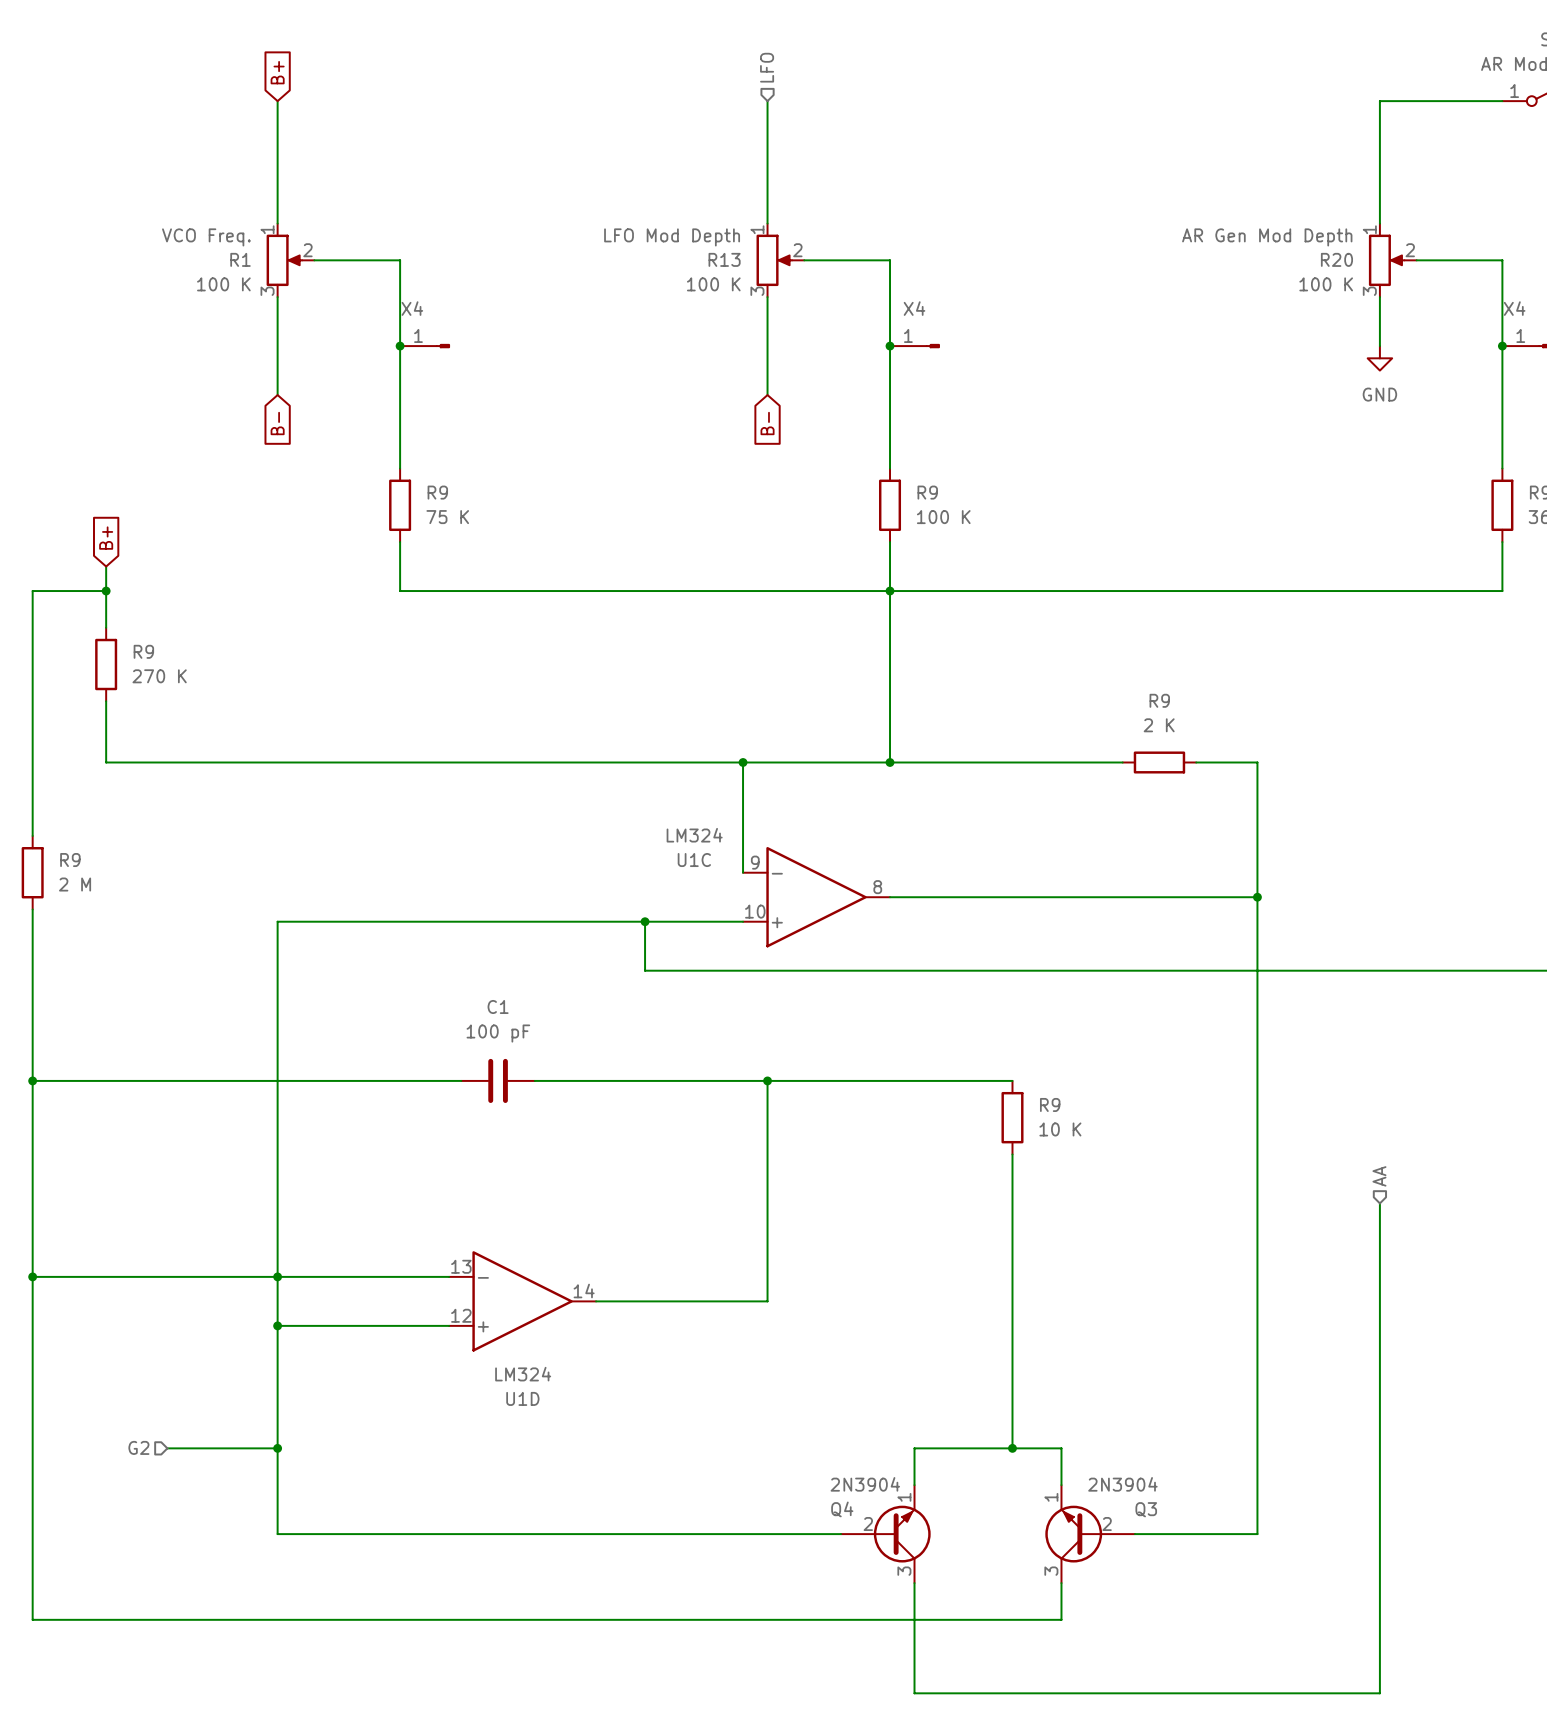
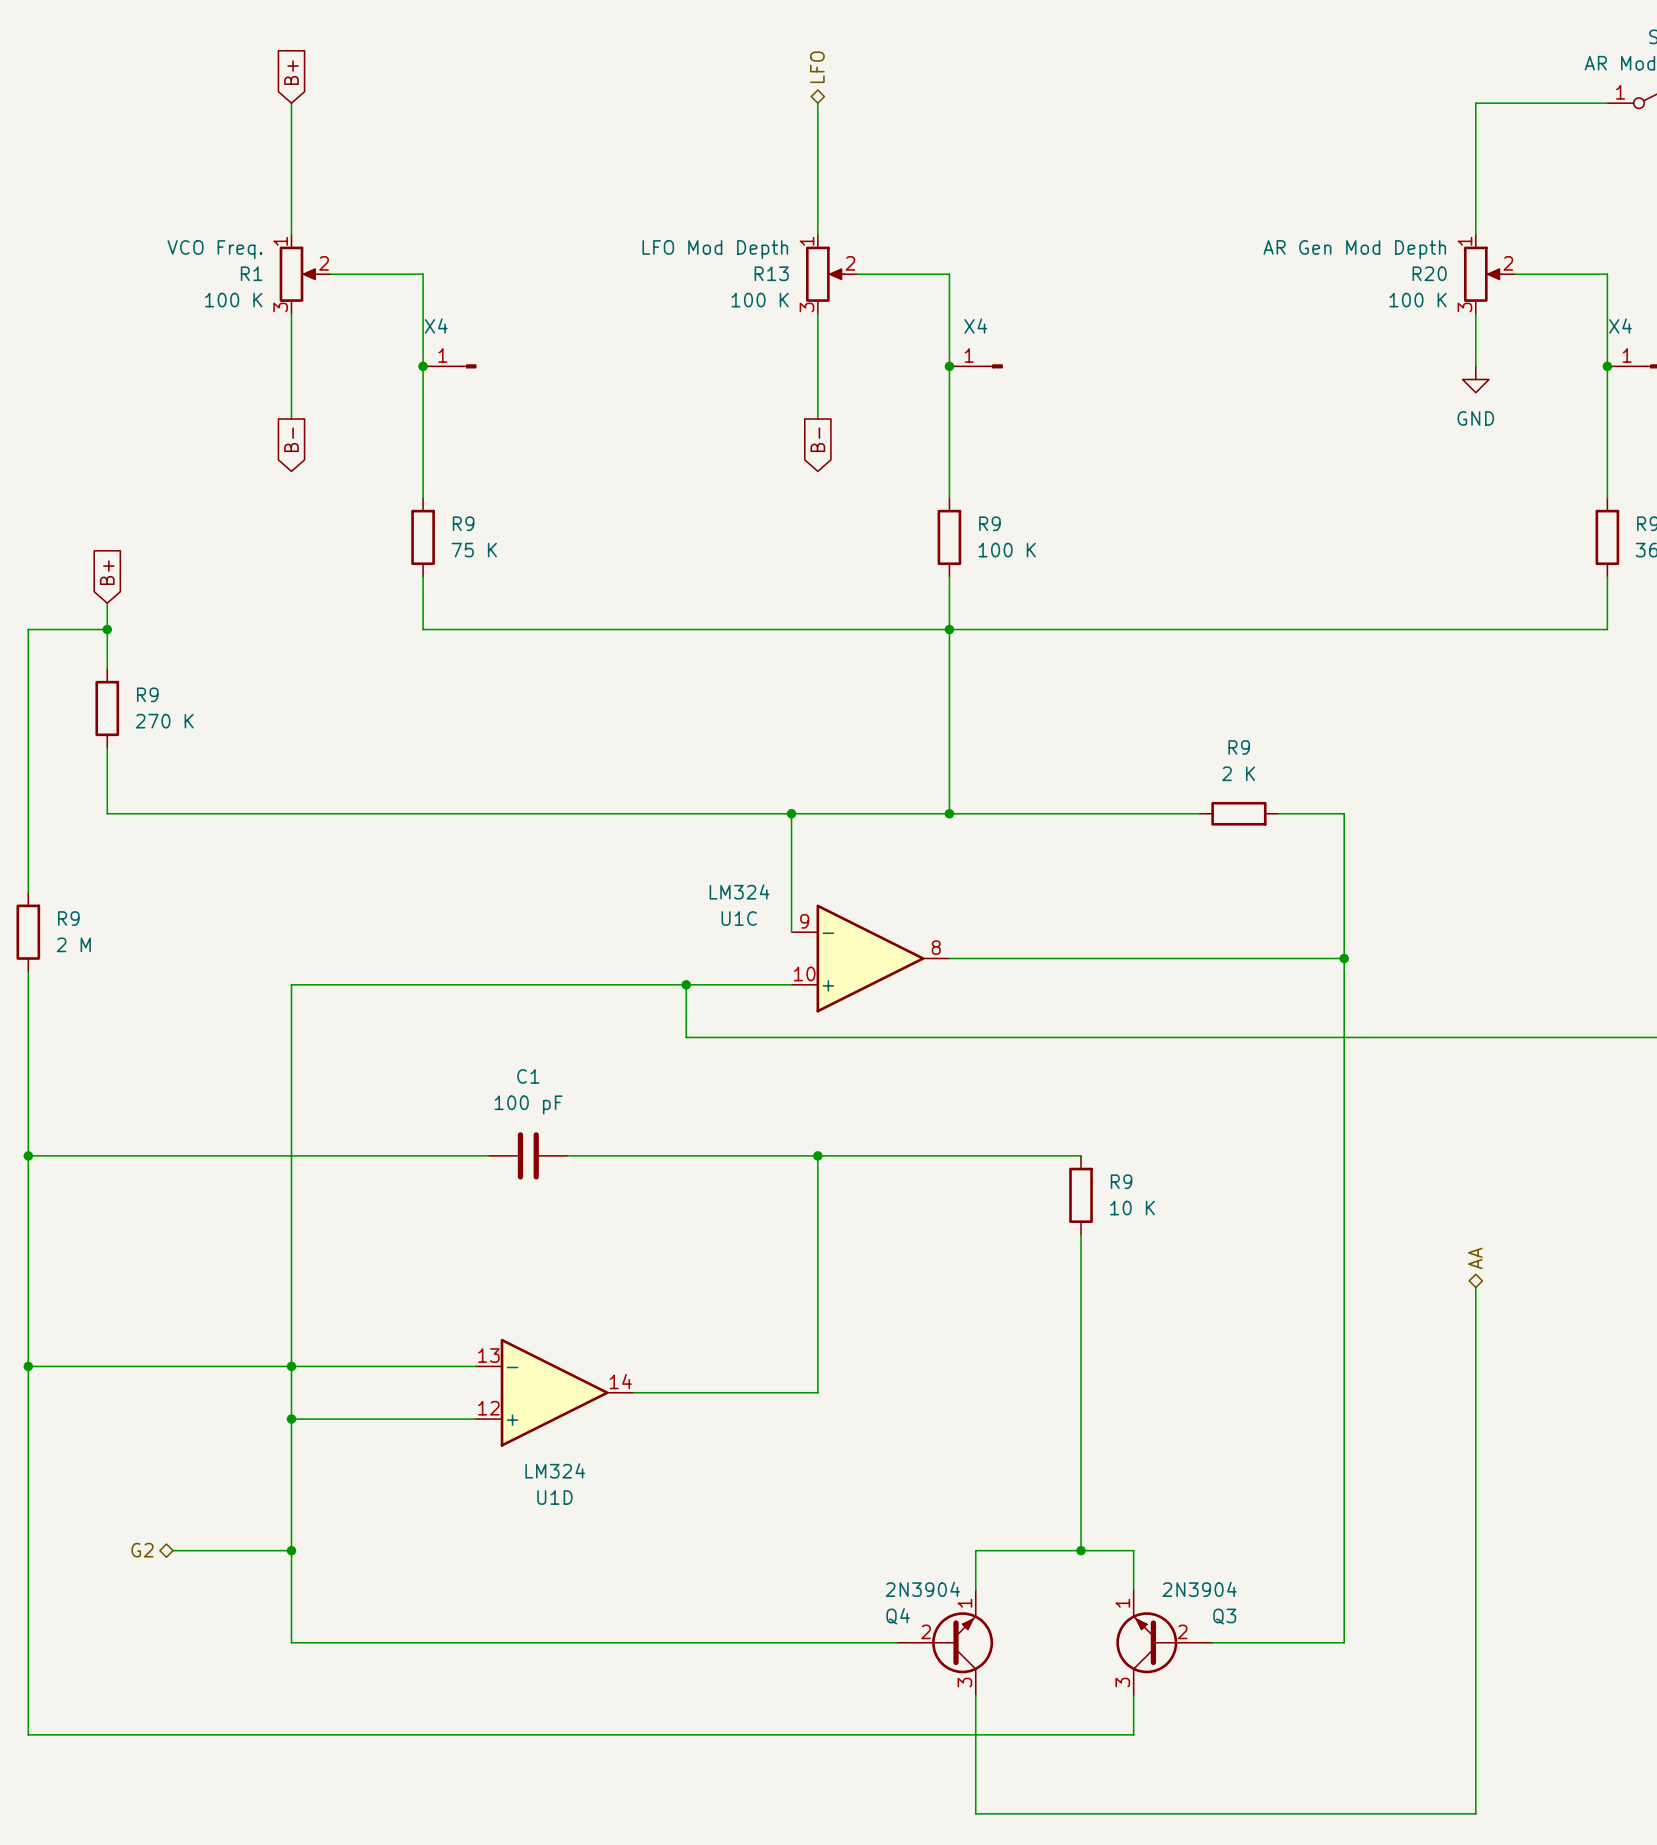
hierarchical label shape: input (767, 67) -> bidirectional (817, 67)
global label shape: input (277, 423) -> output (291, 439)
global label shape: input (767, 423) -> output (817, 439)
hierarchical label shape: input (1379, 1176) -> bidirectional (1475, 1258)
hierarchical label shape: input (138, 1447) -> bidirectional (142, 1550)

